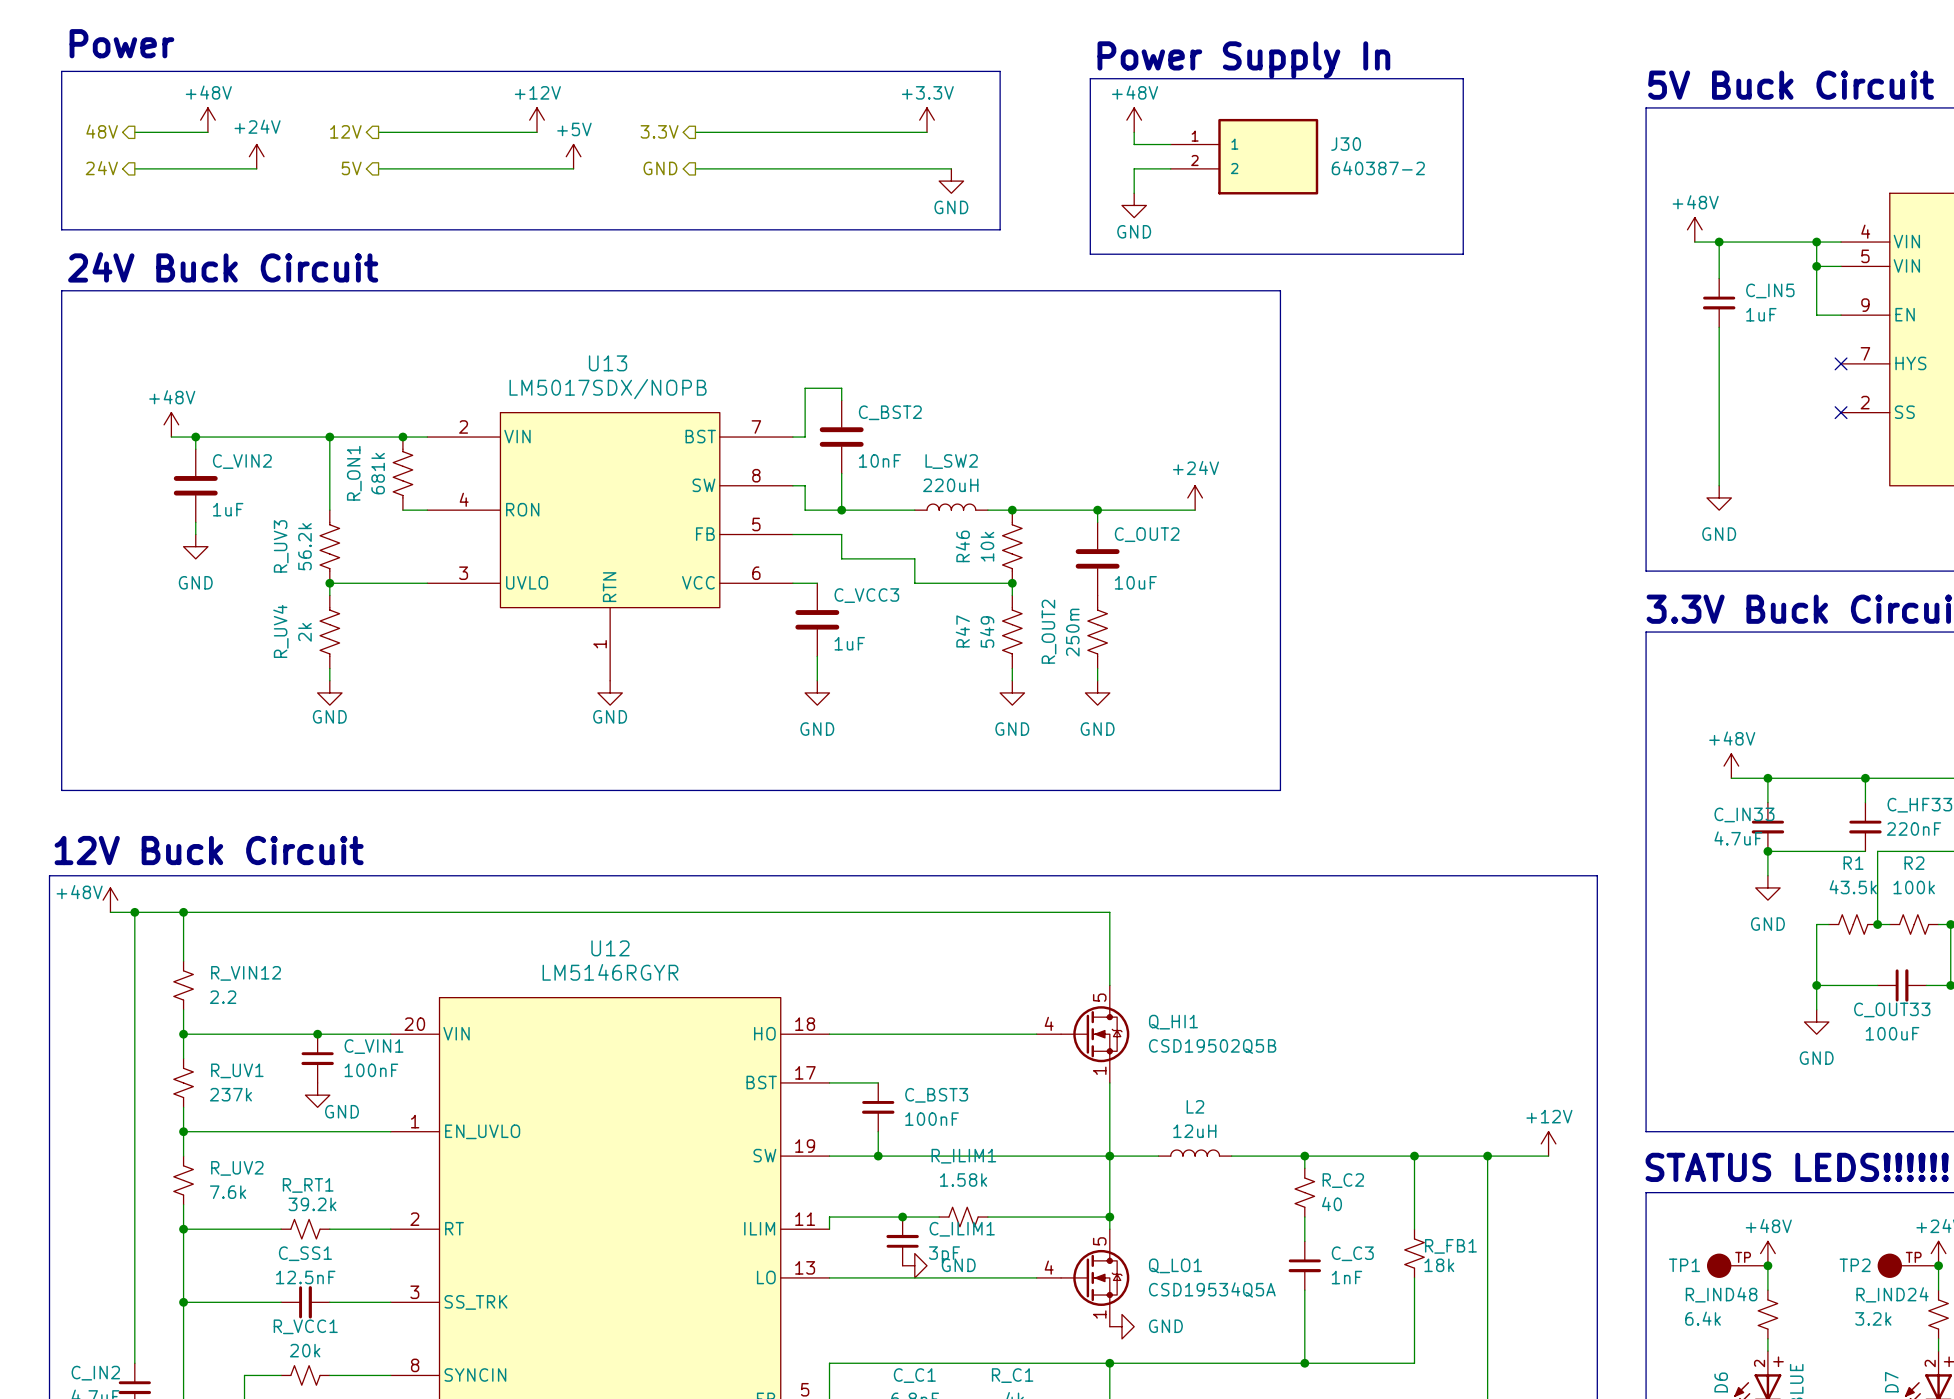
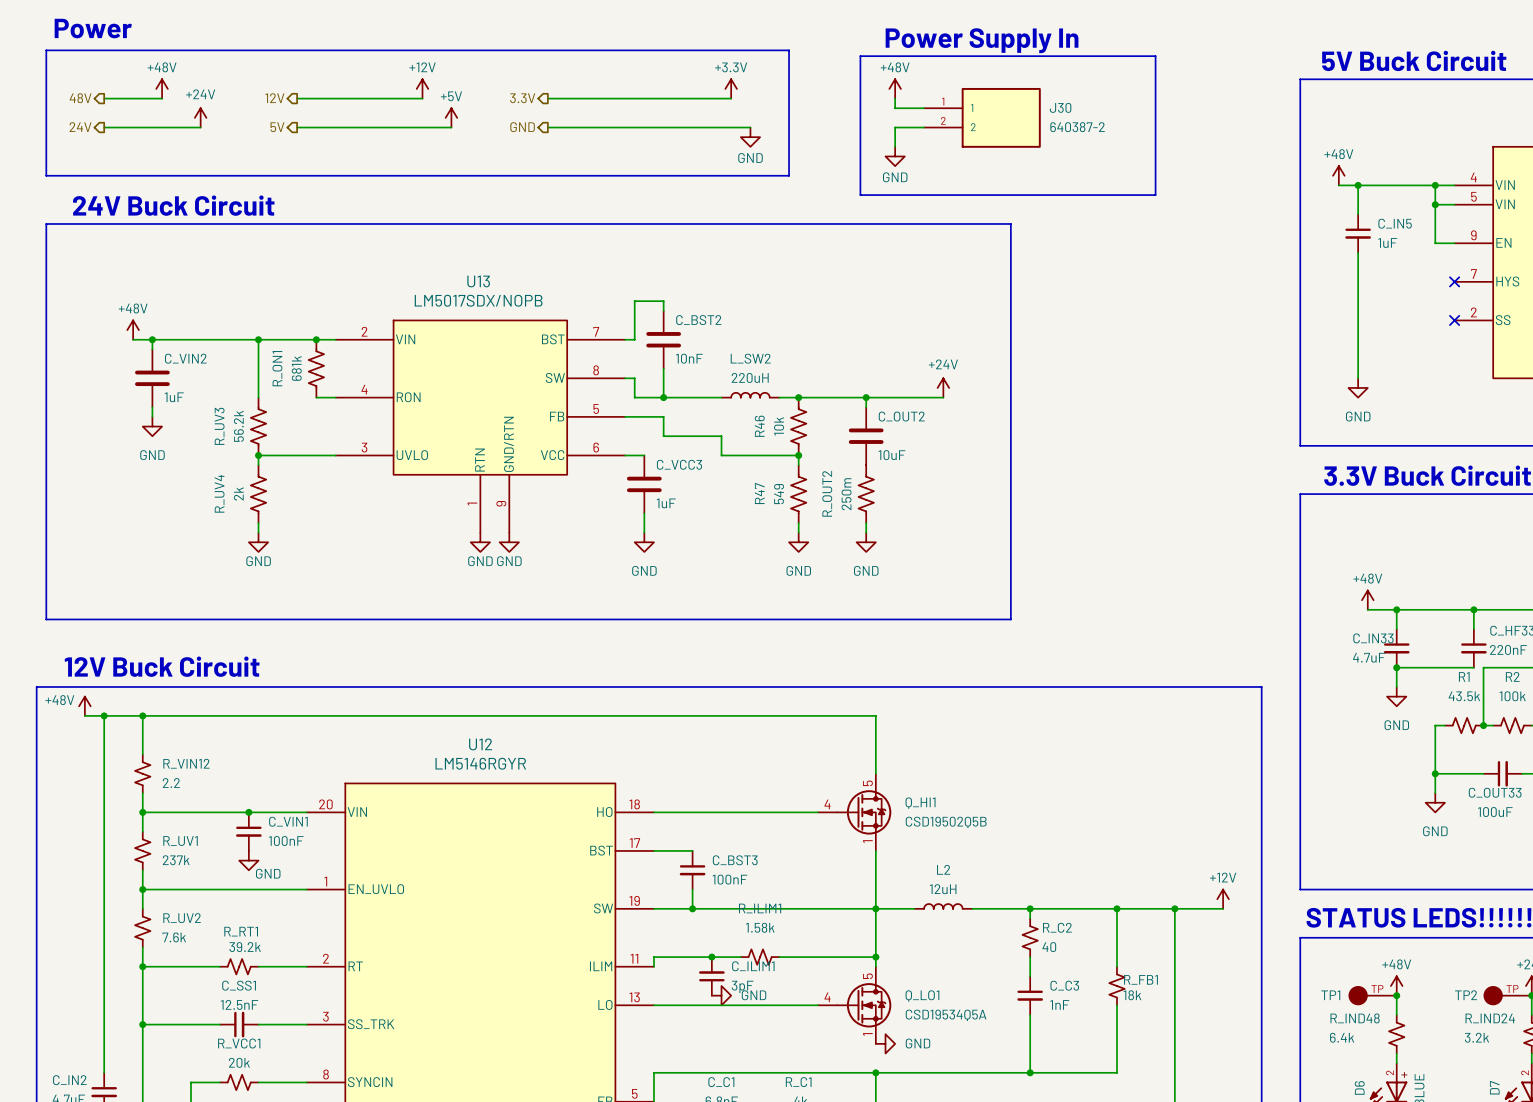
U13 symbol: [427, 412, 793, 681] -> [335, 320, 626, 533]
power symbol: none -> GND (509, 542)

